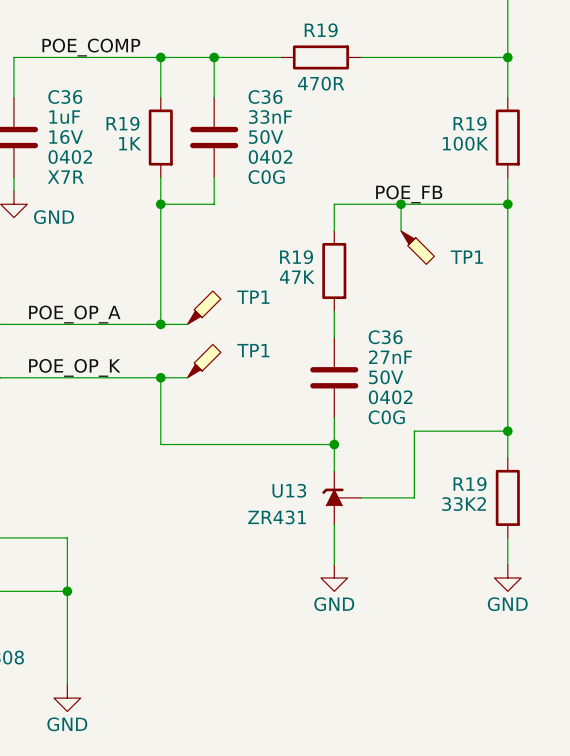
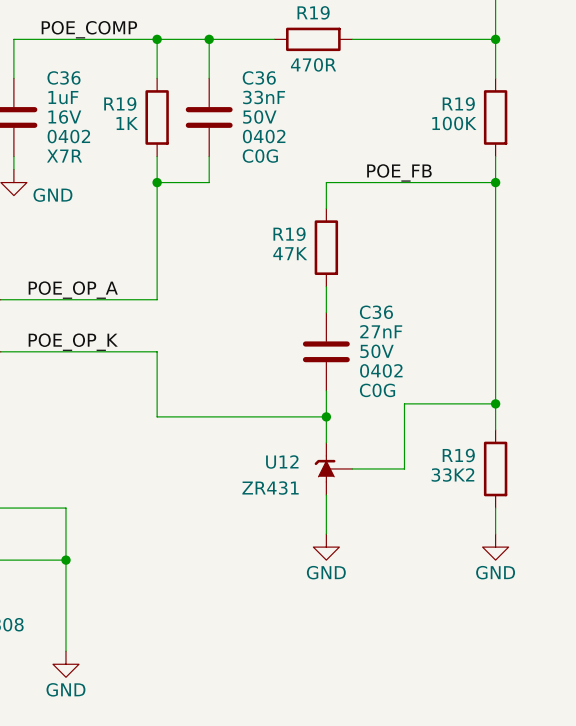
wire: (401, 204) (401, 230) -> none
junction: (401, 204) -> none
TP1: (417, 247) -> none
TP1: (204, 307) -> none
wire: (160, 324) (187, 324) -> none
junction: (160, 324) -> none
TP1: (204, 361) -> none
wire: (160, 377) (187, 377) -> none
junction: (160, 377) -> none
U13 name: U13 (289, 490) -> U12 (282, 462)

